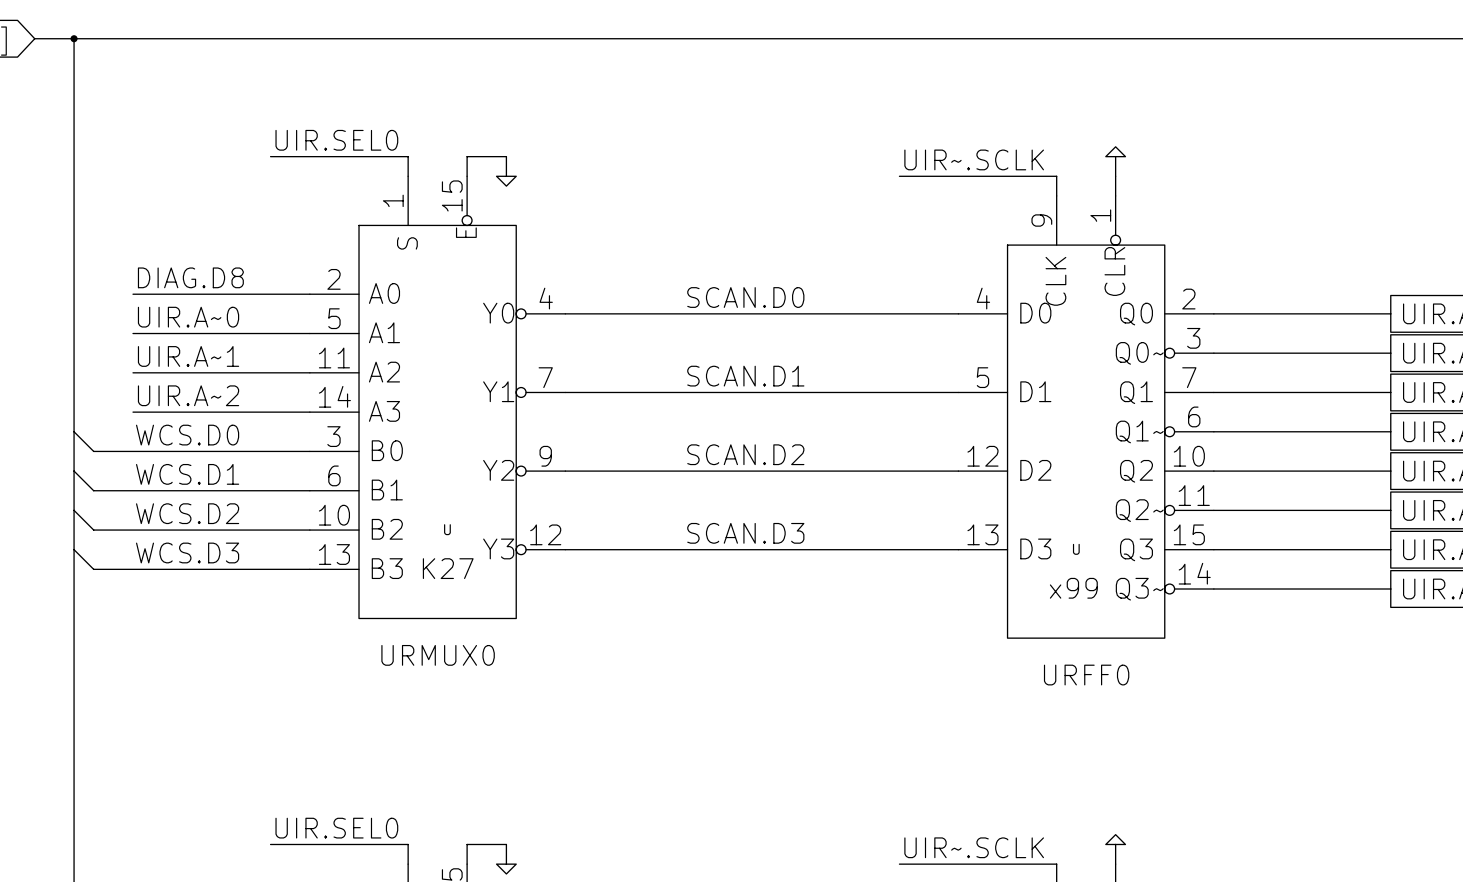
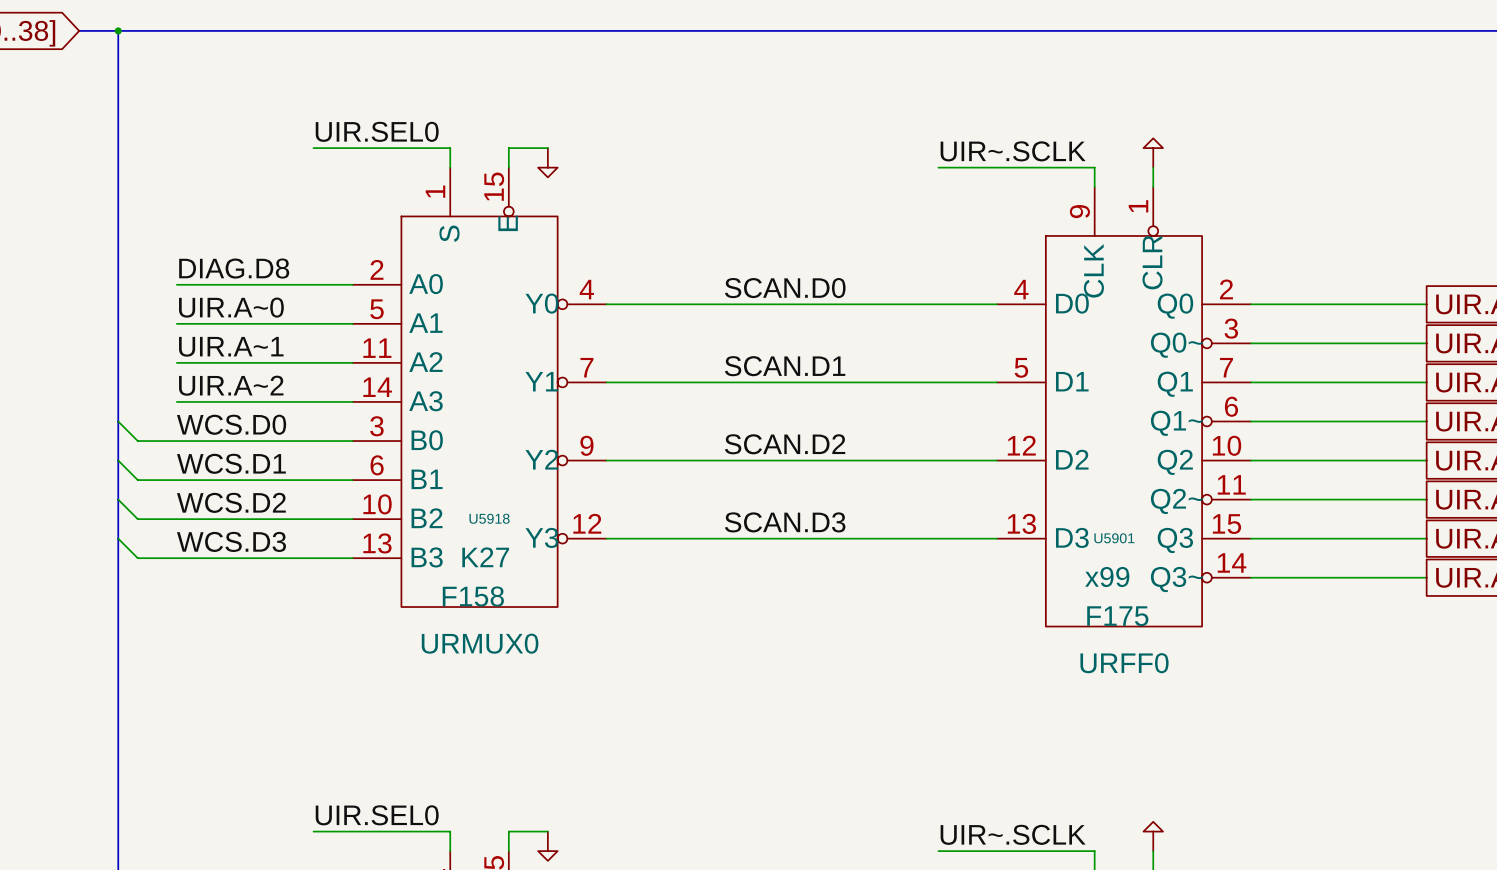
U name: U (447, 529) -> U5918 (489, 518)
U name: U (1076, 549) -> U5901 (1114, 538)
U value: none -> F158 (473, 596)
U value: none -> F175 (1117, 616)

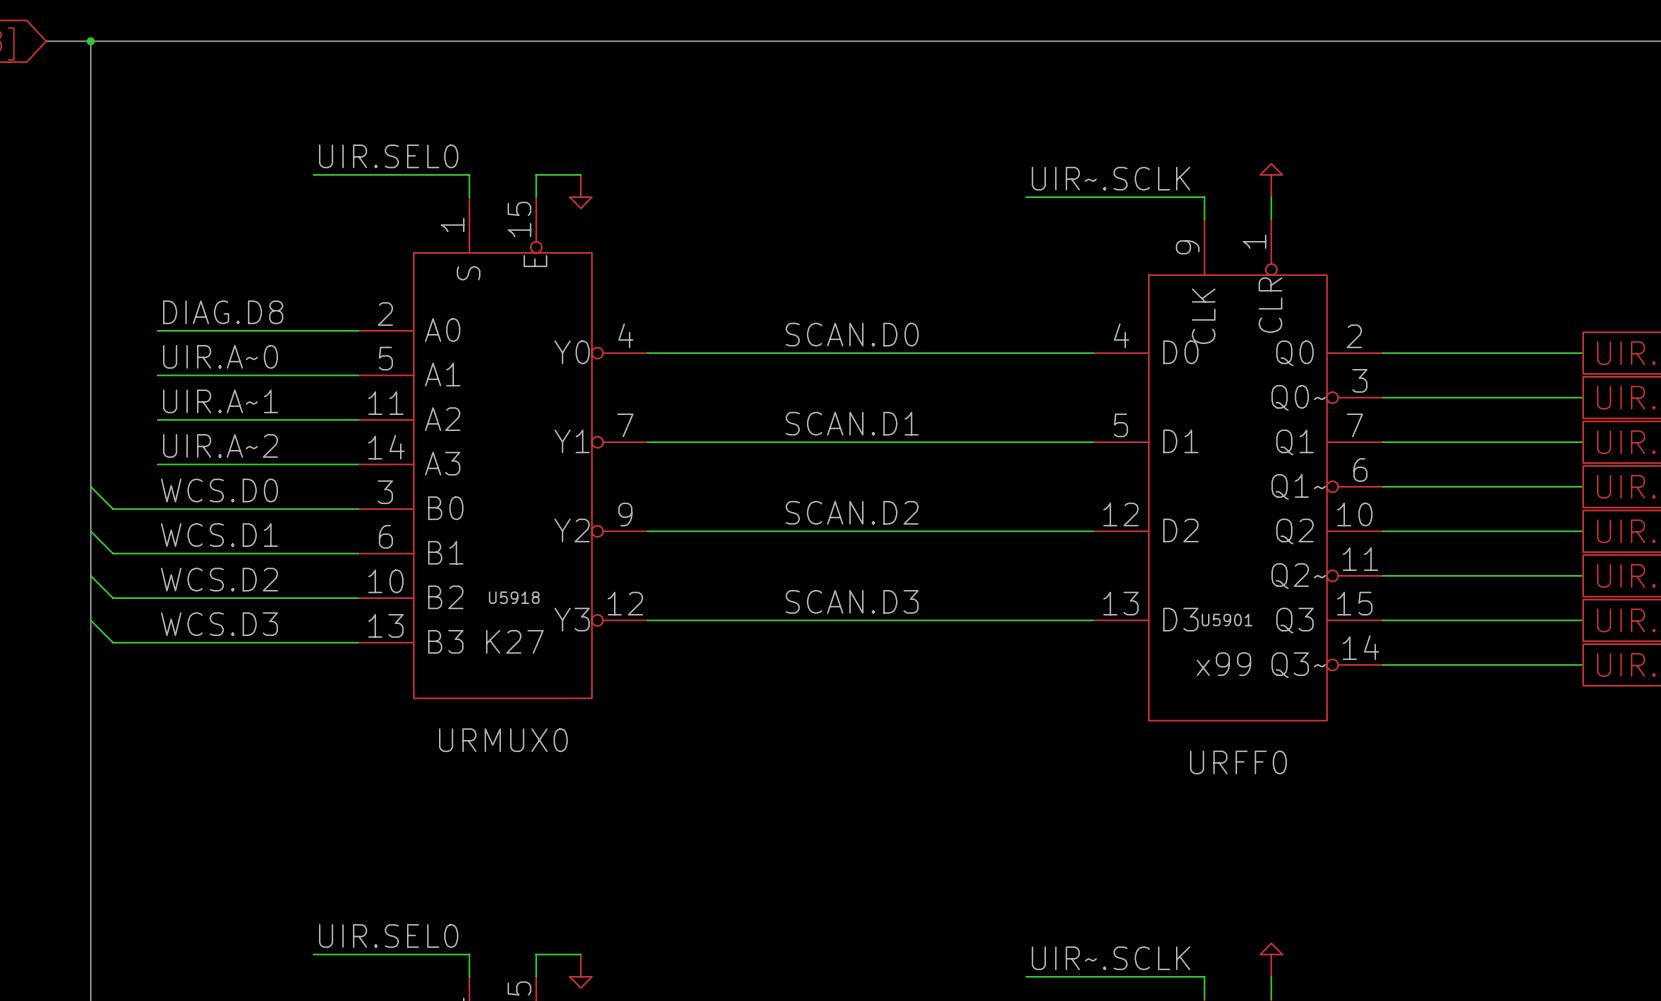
U5918 value: F158 (473, 596) -> none
U5901 value: F175 (1117, 616) -> none

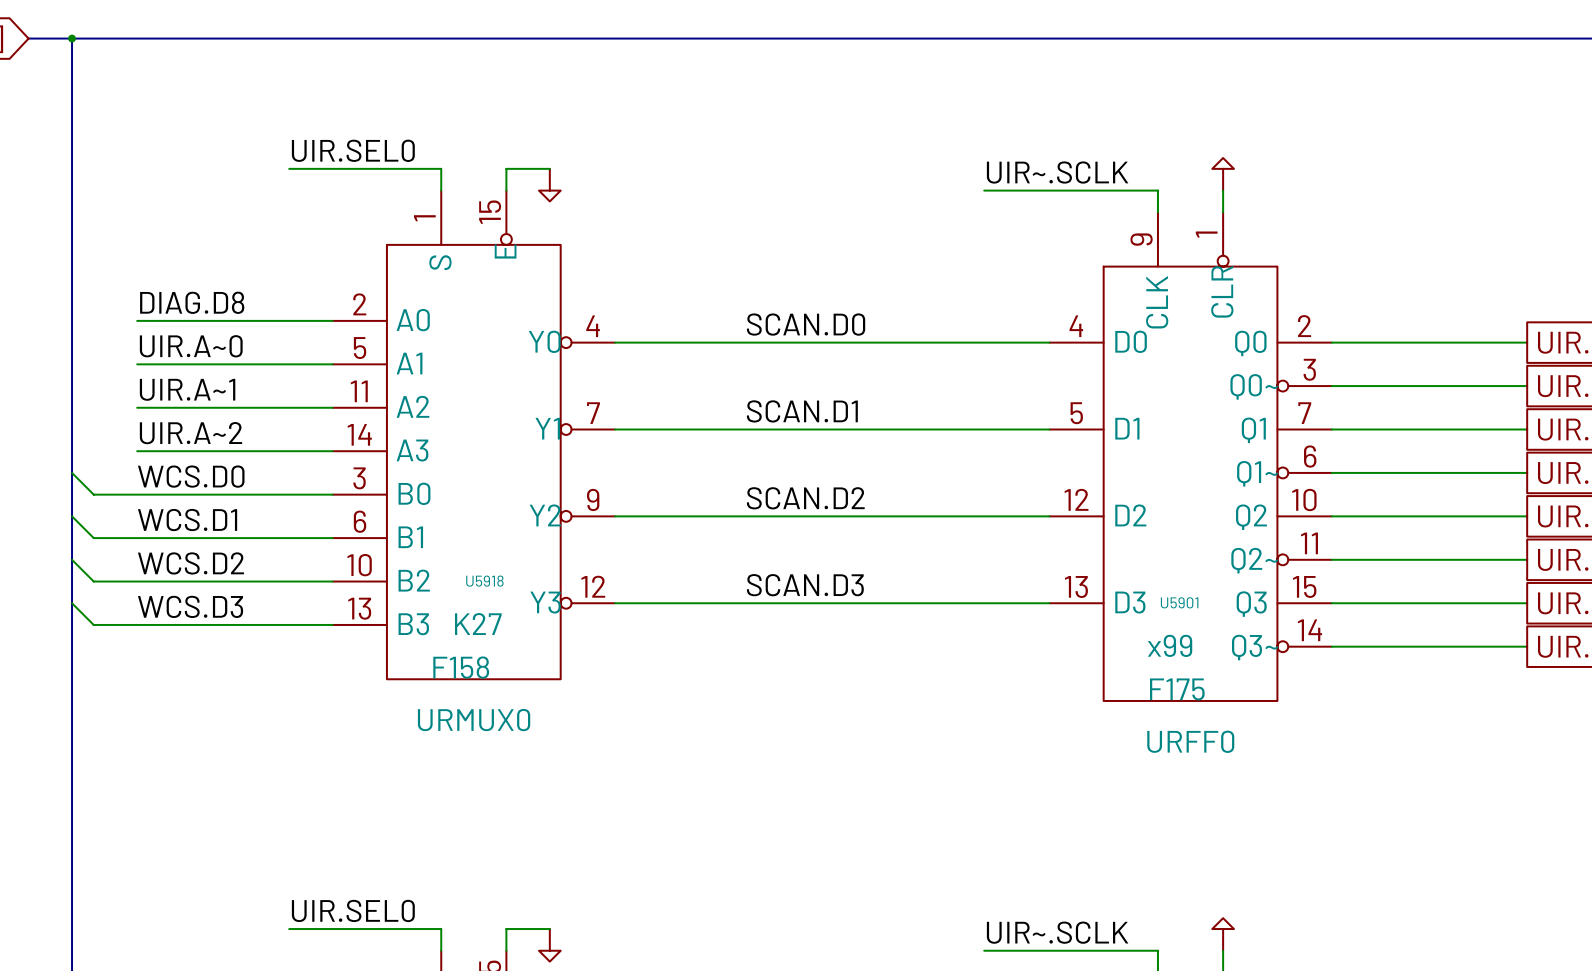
U5918 value: none -> F158 (461, 667)
U5901 value: none -> F175 (1177, 689)

